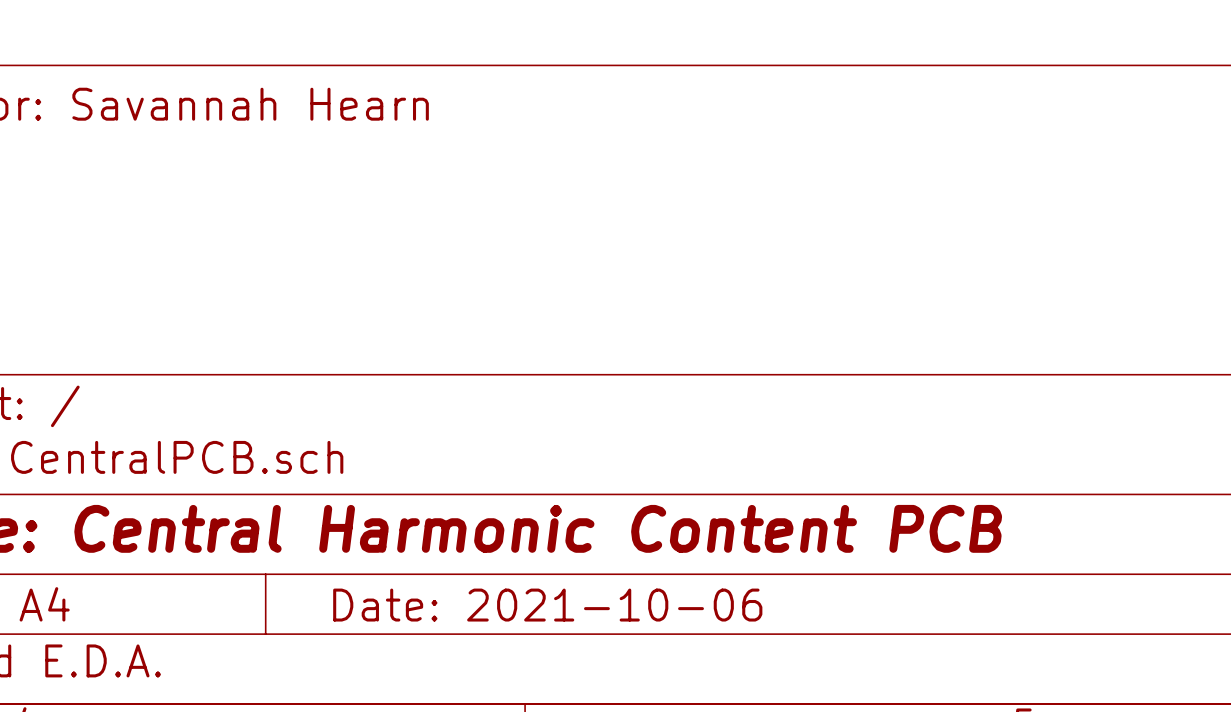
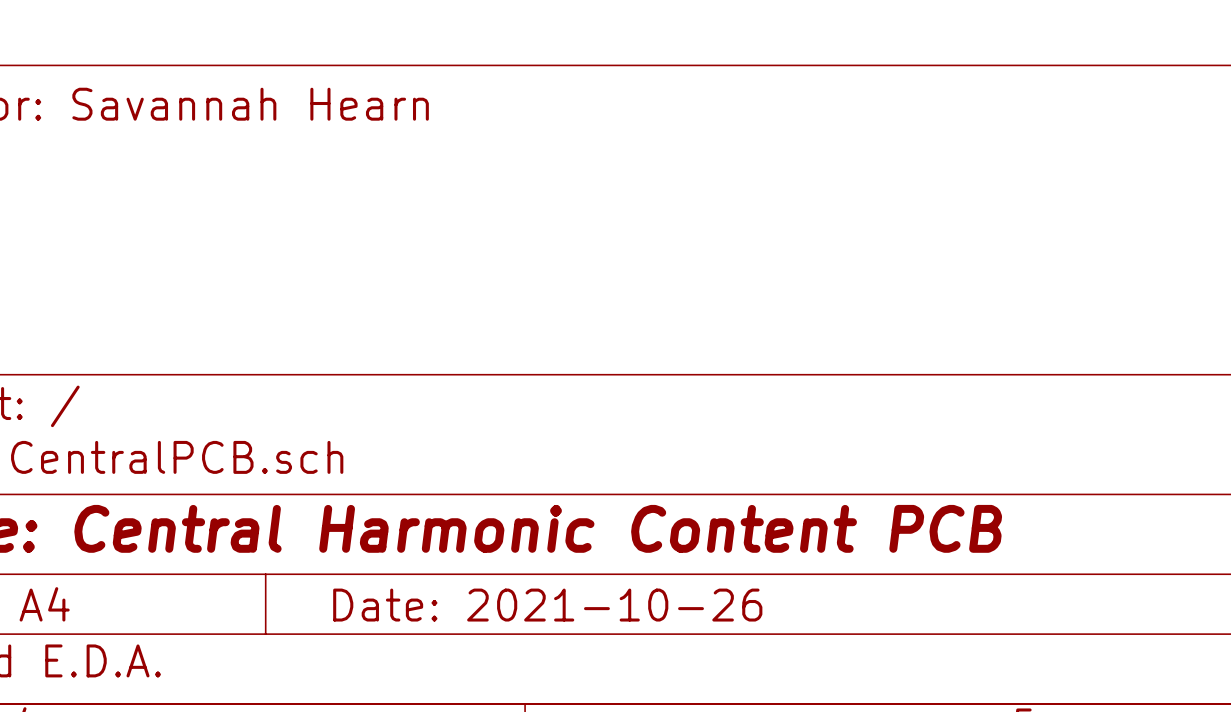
title block: Date: 2021-10-06 (547, 605) -> Date: 2021-10-26 (547, 605)

